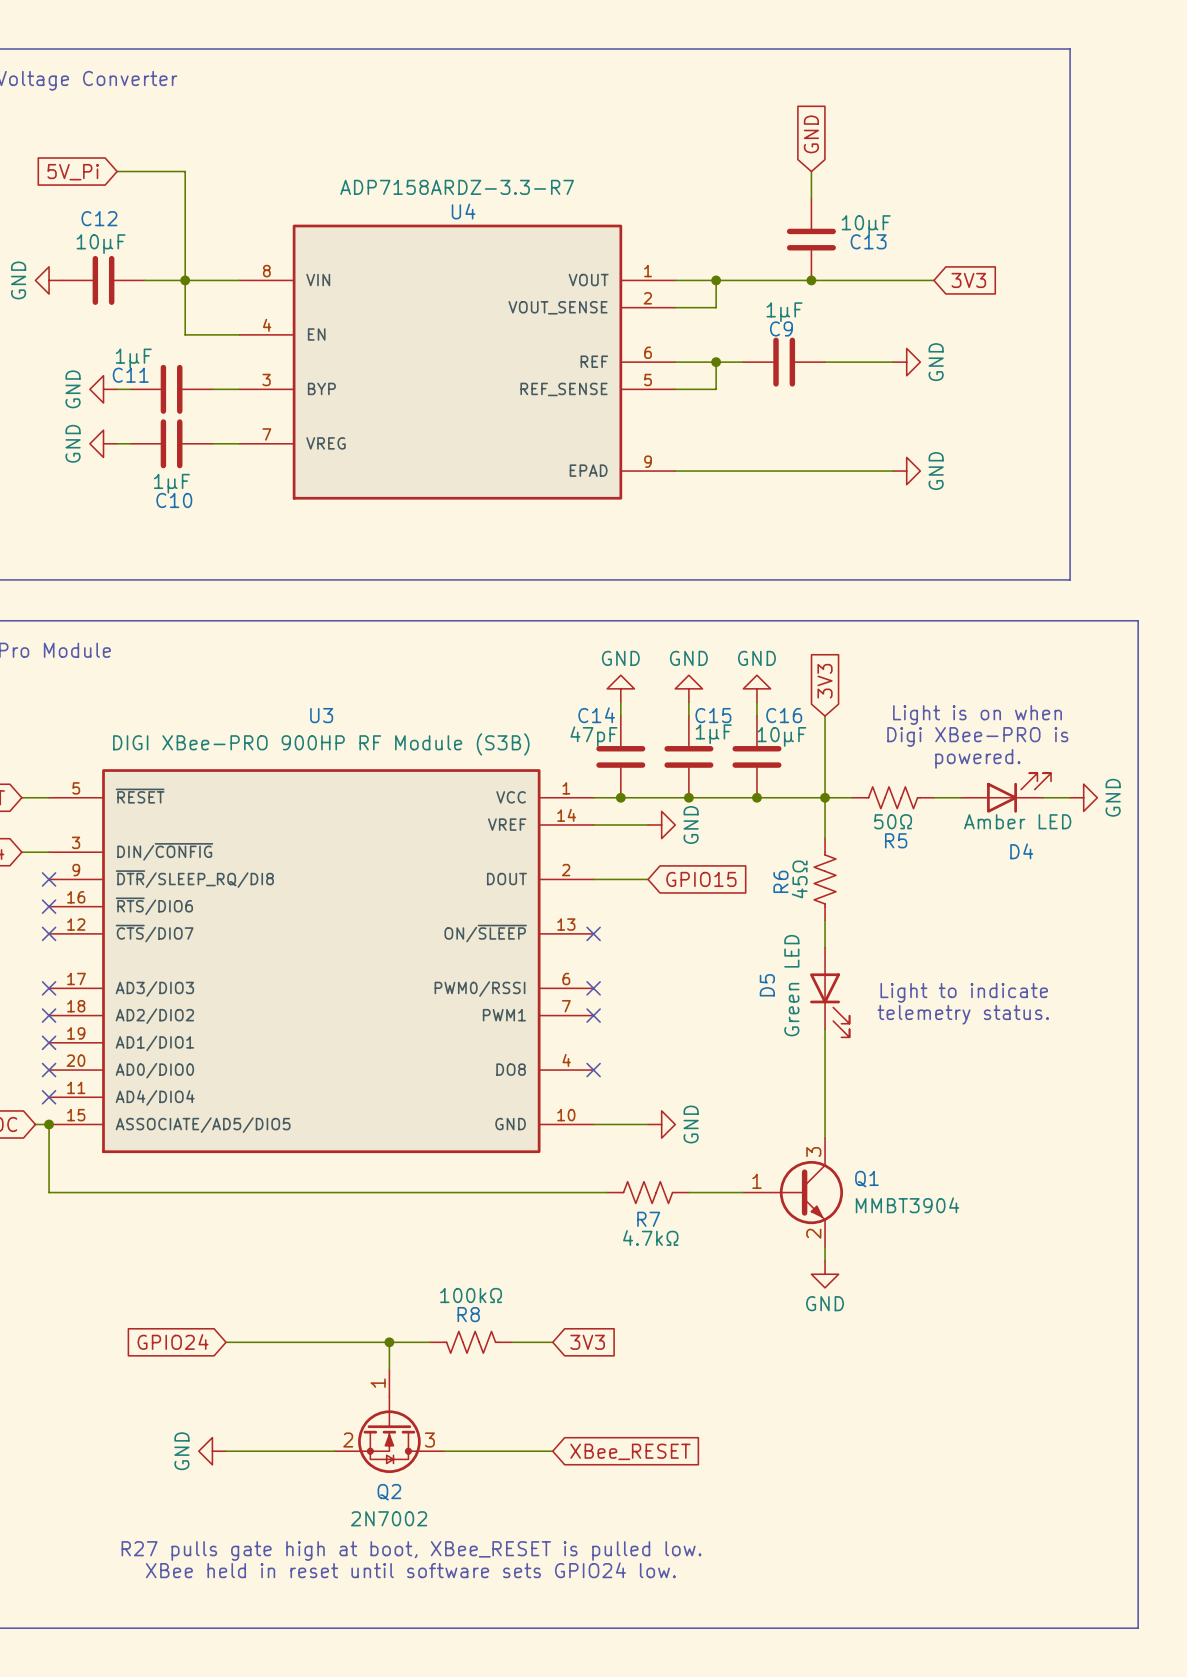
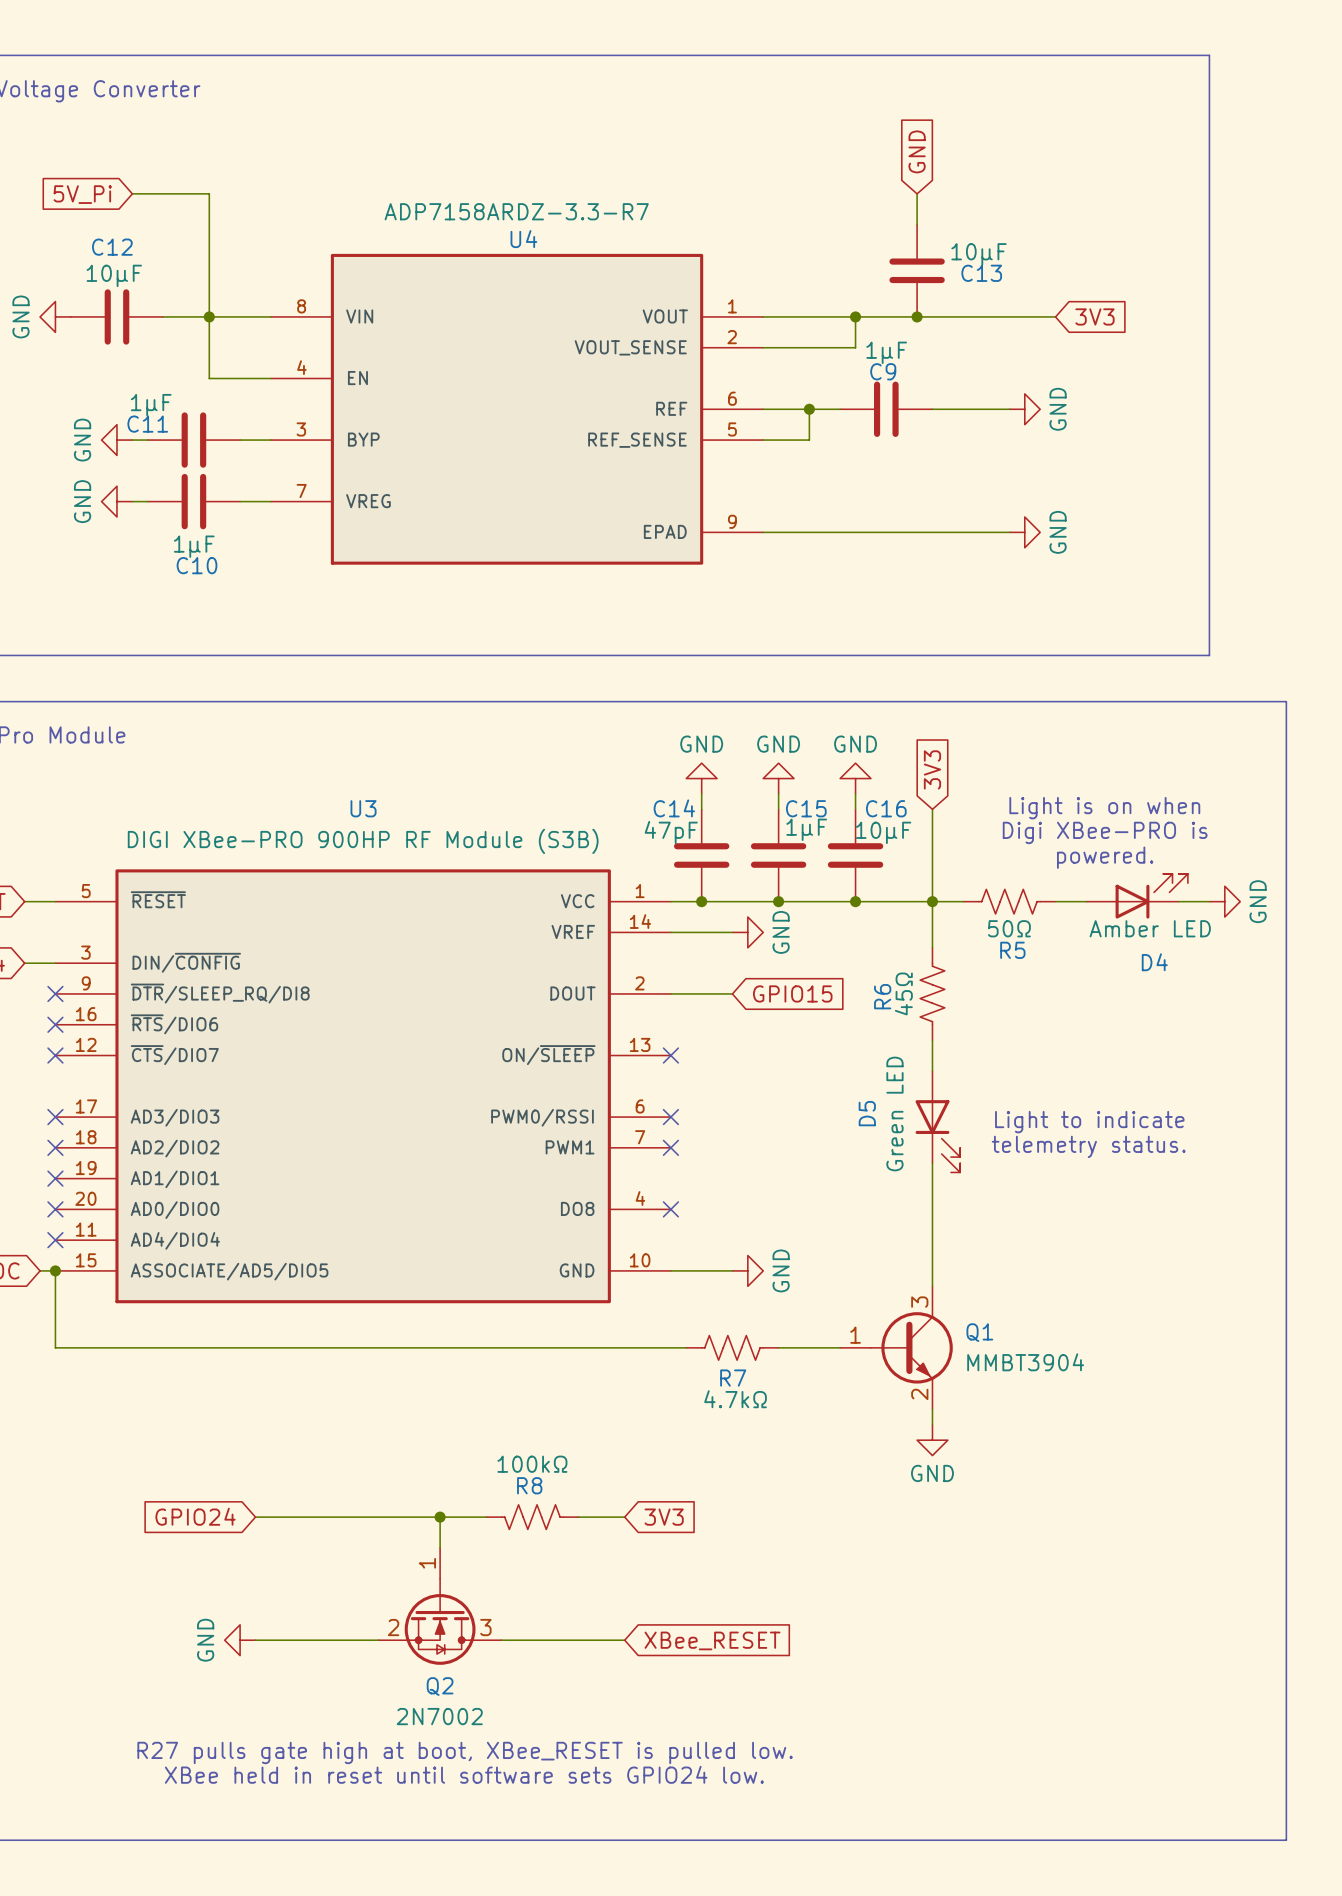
wire: (716, 280) (716, 307) -> (855, 316) (855, 347) (809, 347)
junction position: (716, 280) -> (855, 316)

